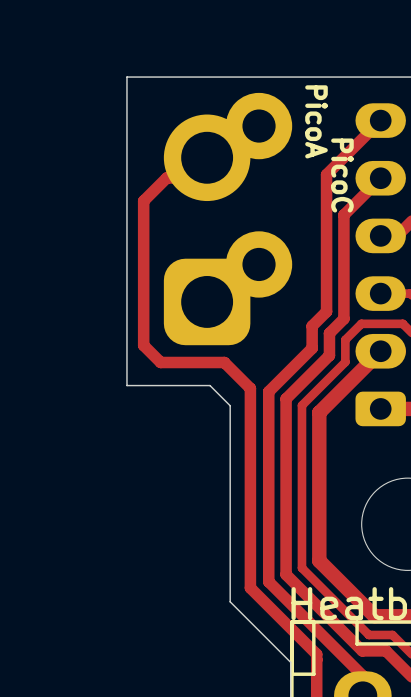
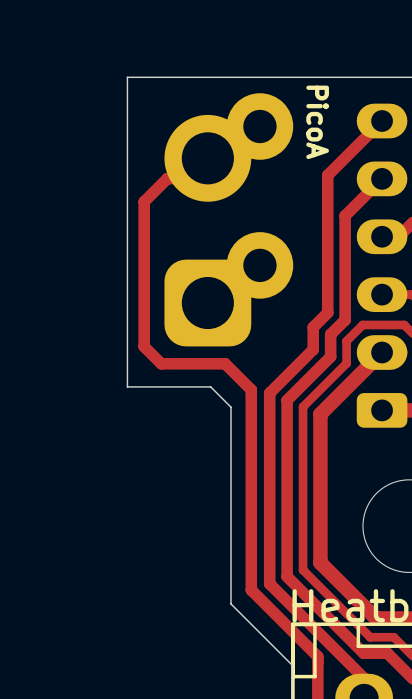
part value: PicoC (342, 175) -> none

